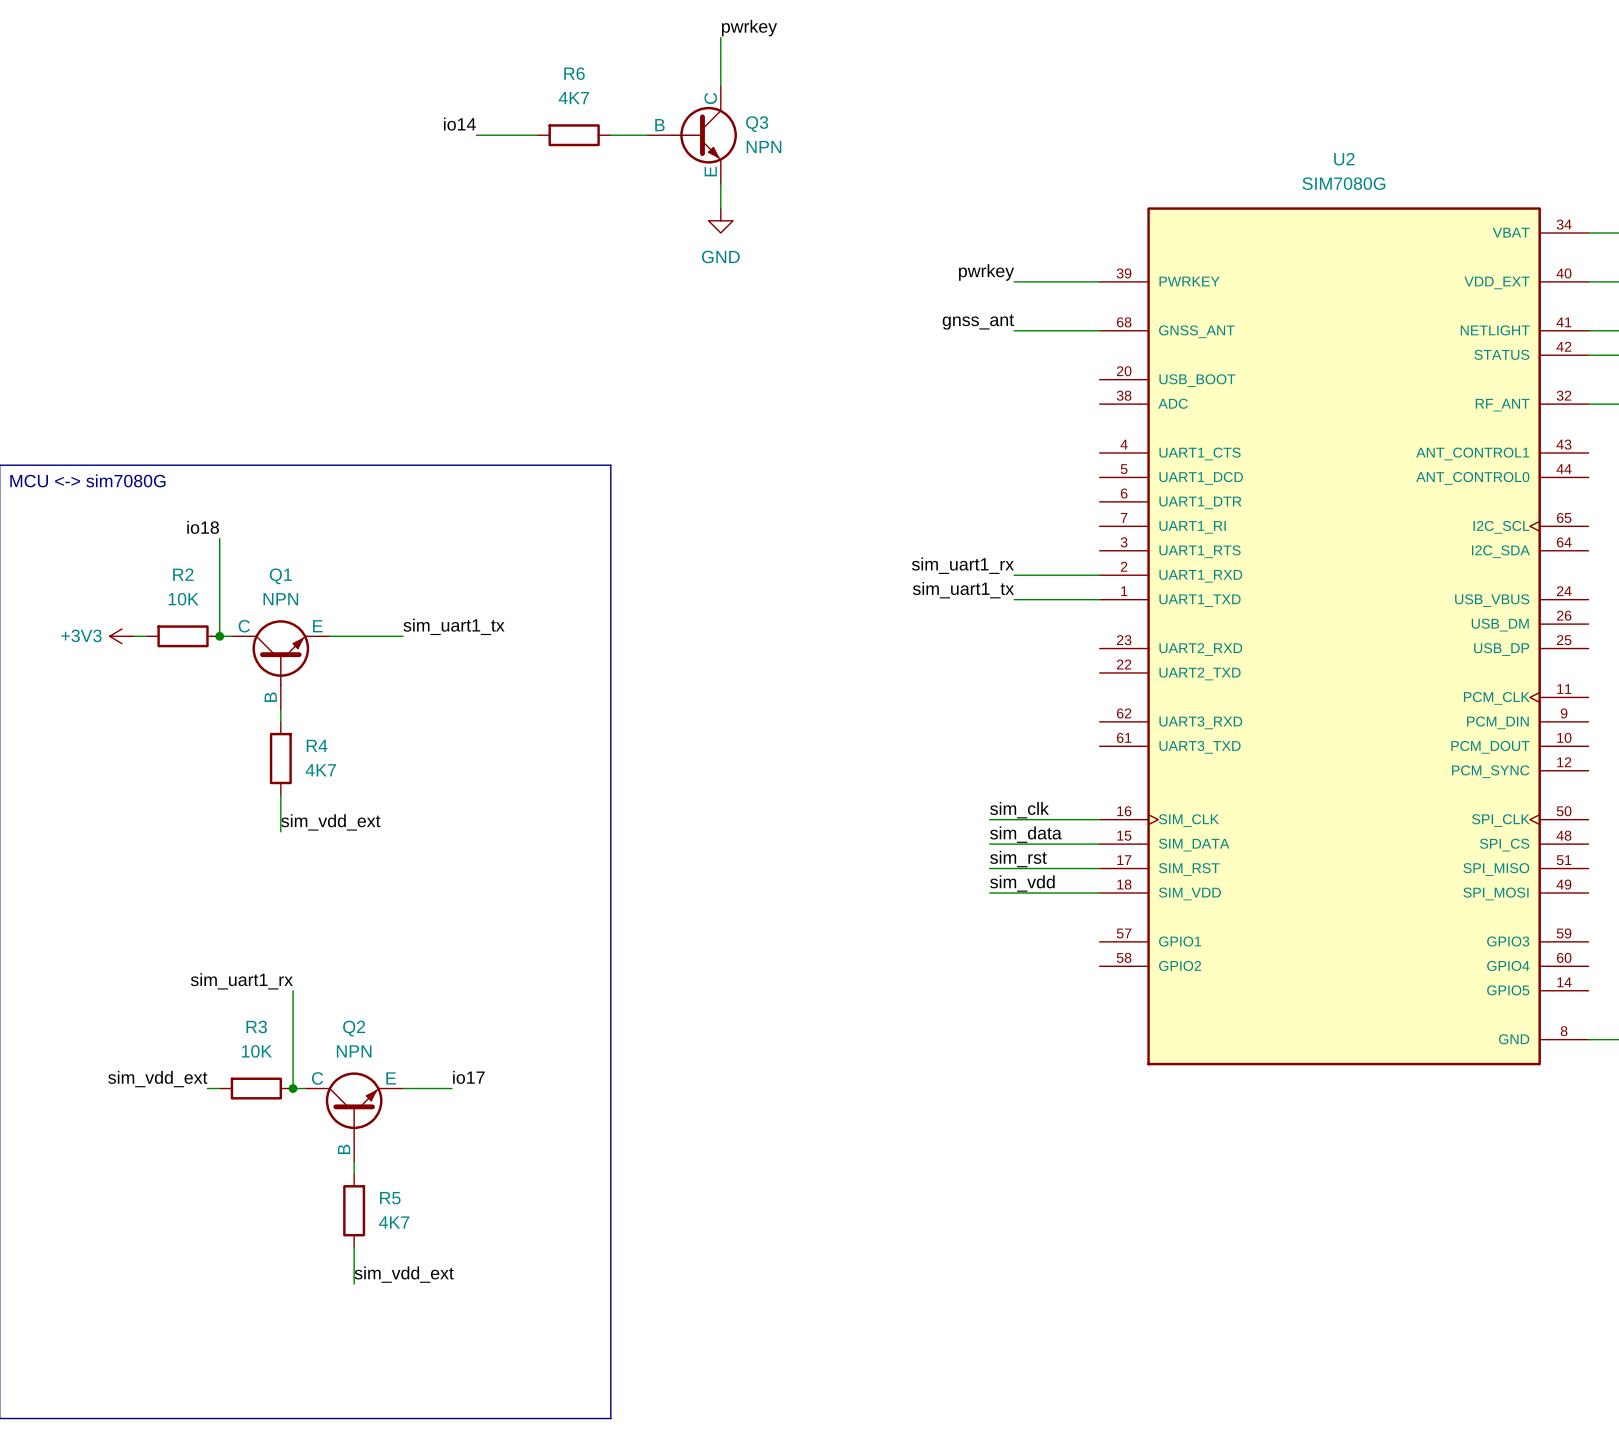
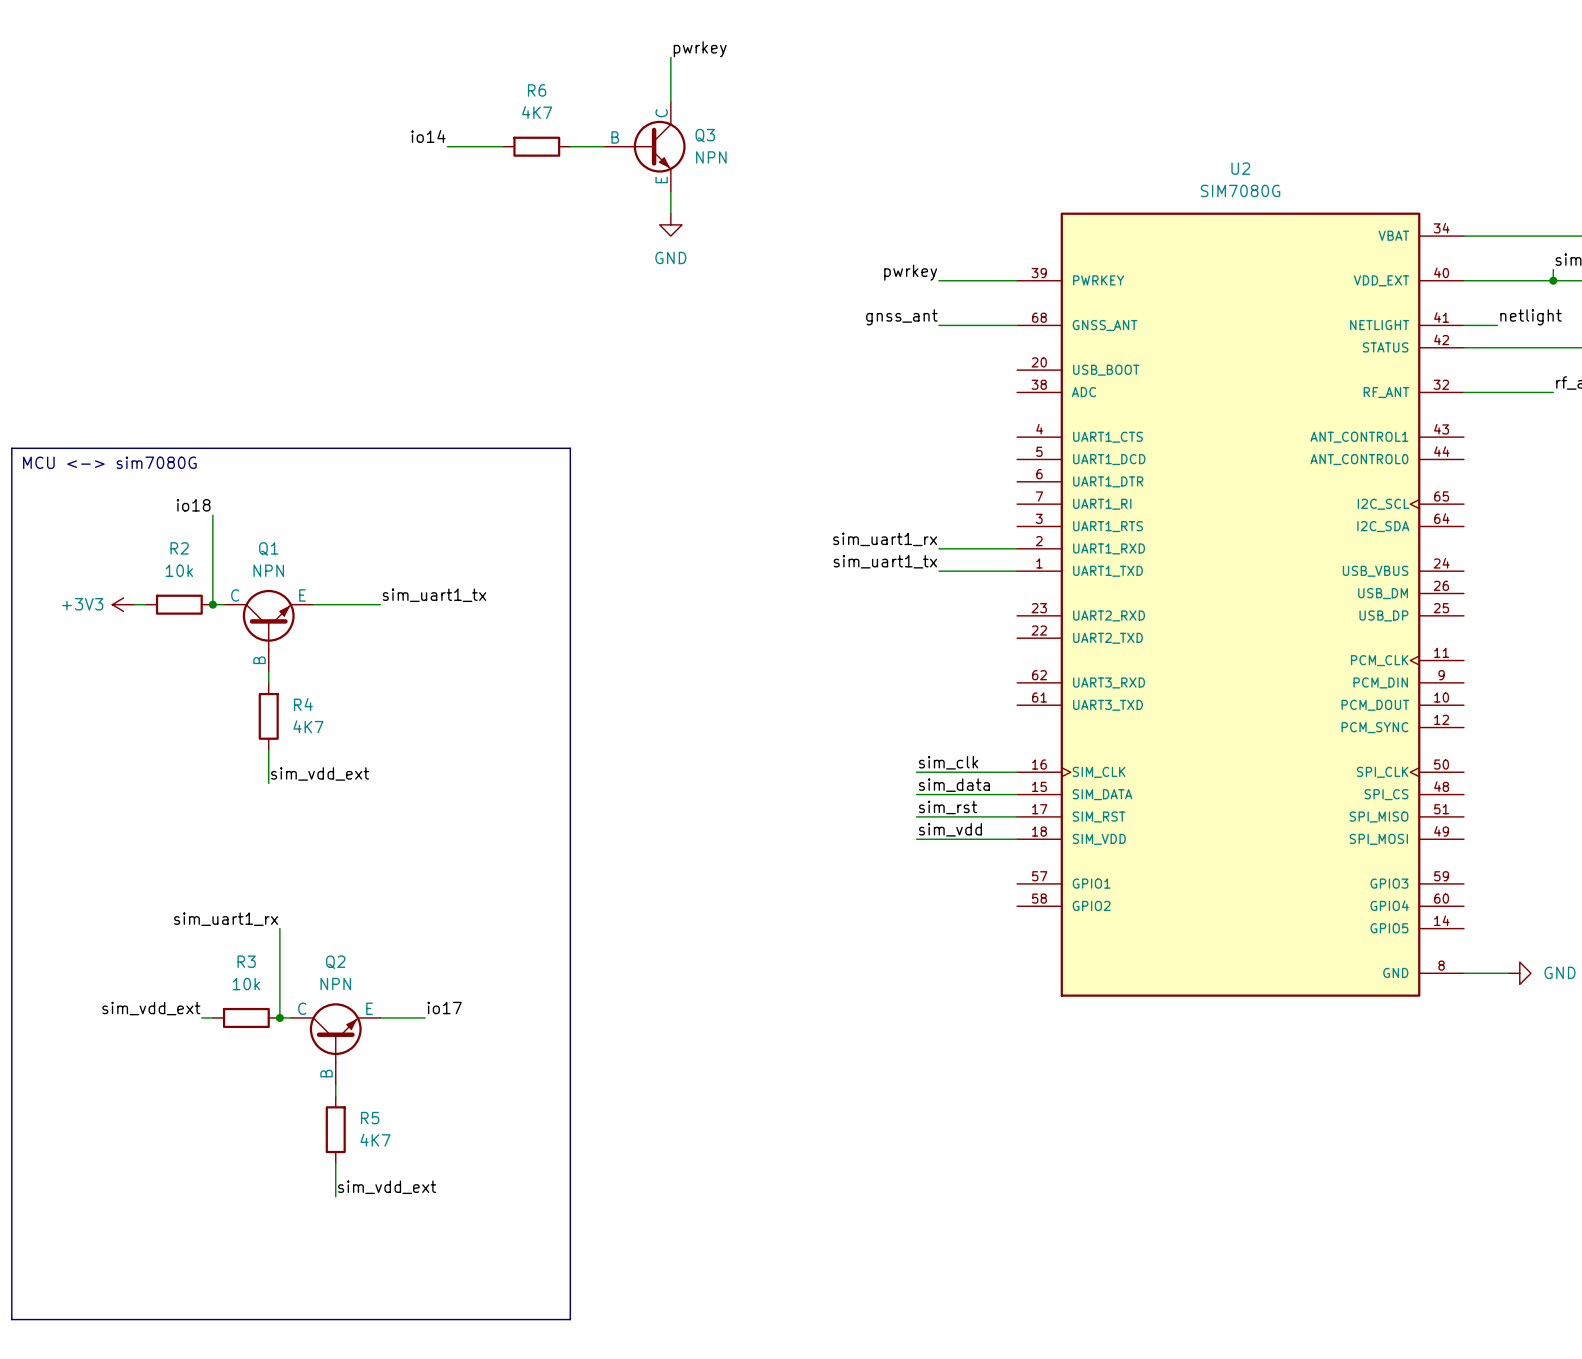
R2 value: 10K (183, 599) -> 10k (179, 570)
R3 value: 10K (256, 1051) -> 10k (246, 984)

